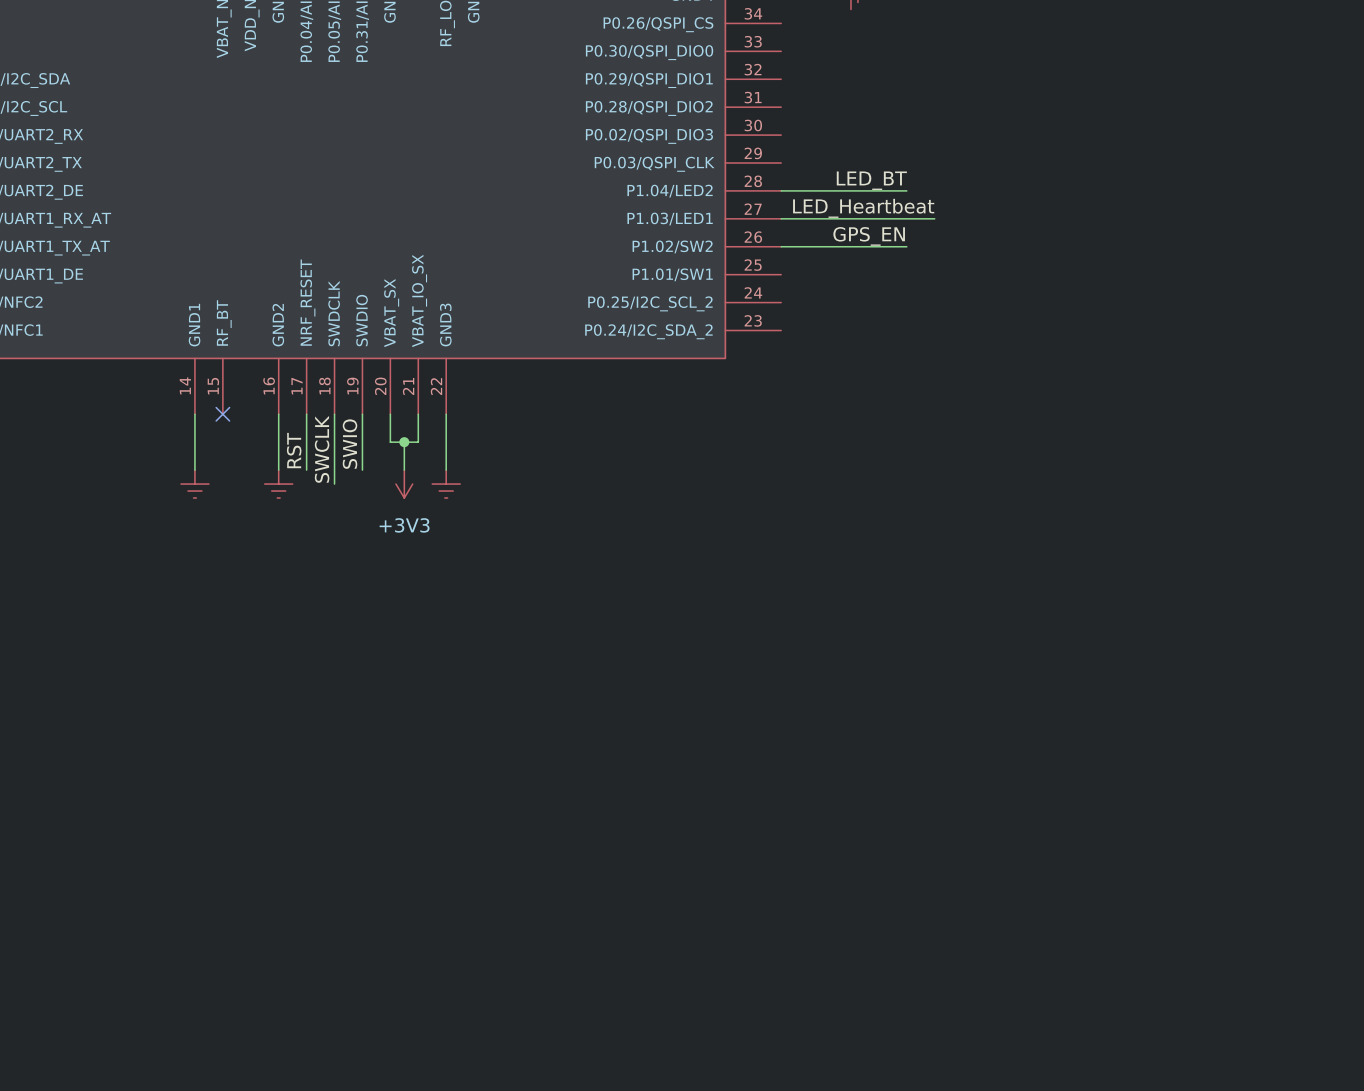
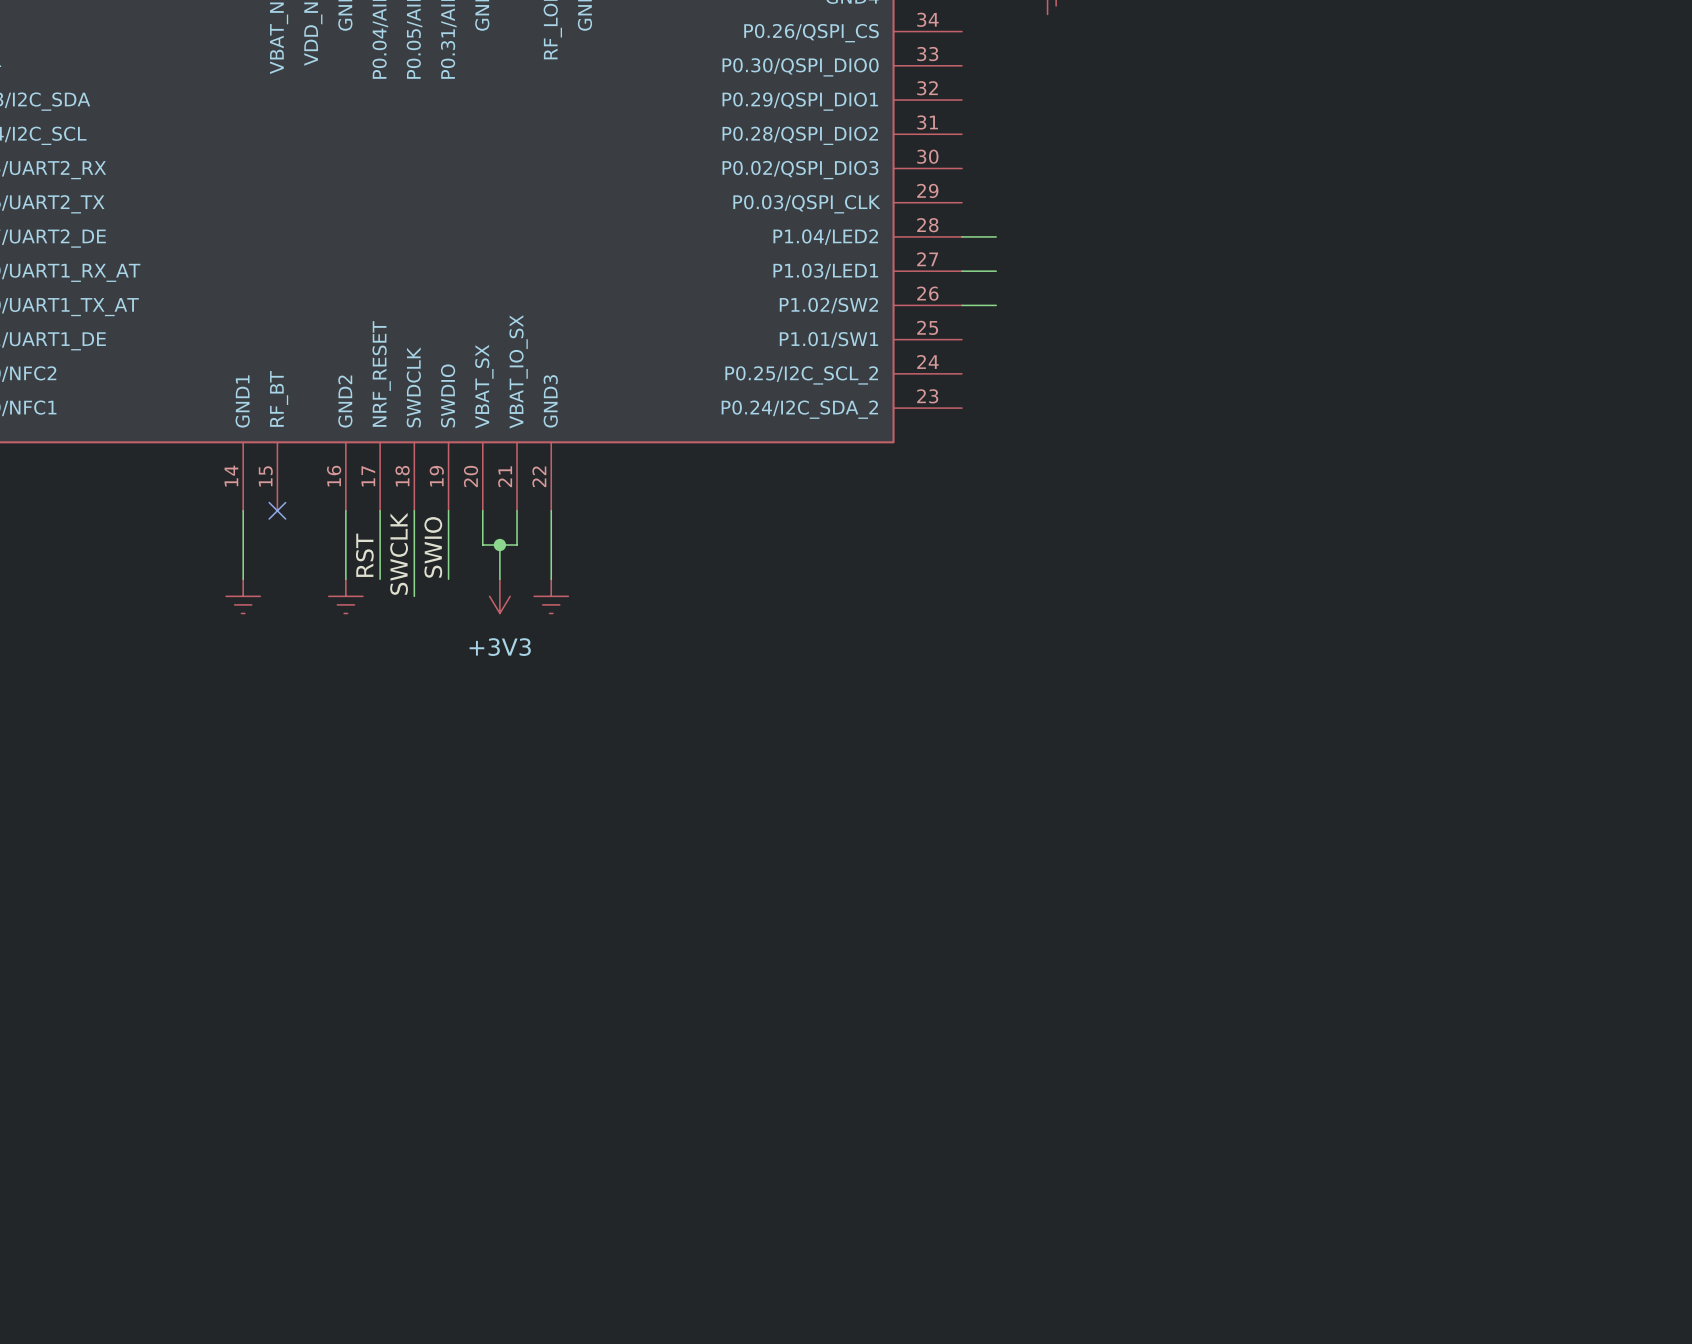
label: LED_BT (871, 180) -> none
wire: (809, 190) (906, 190) -> none
label: LED_Heartbeat (863, 208) -> none
wire: (809, 218) (934, 218) -> none
label: GPS_EN (869, 236) -> none
wire: (809, 246) (906, 246) -> none

